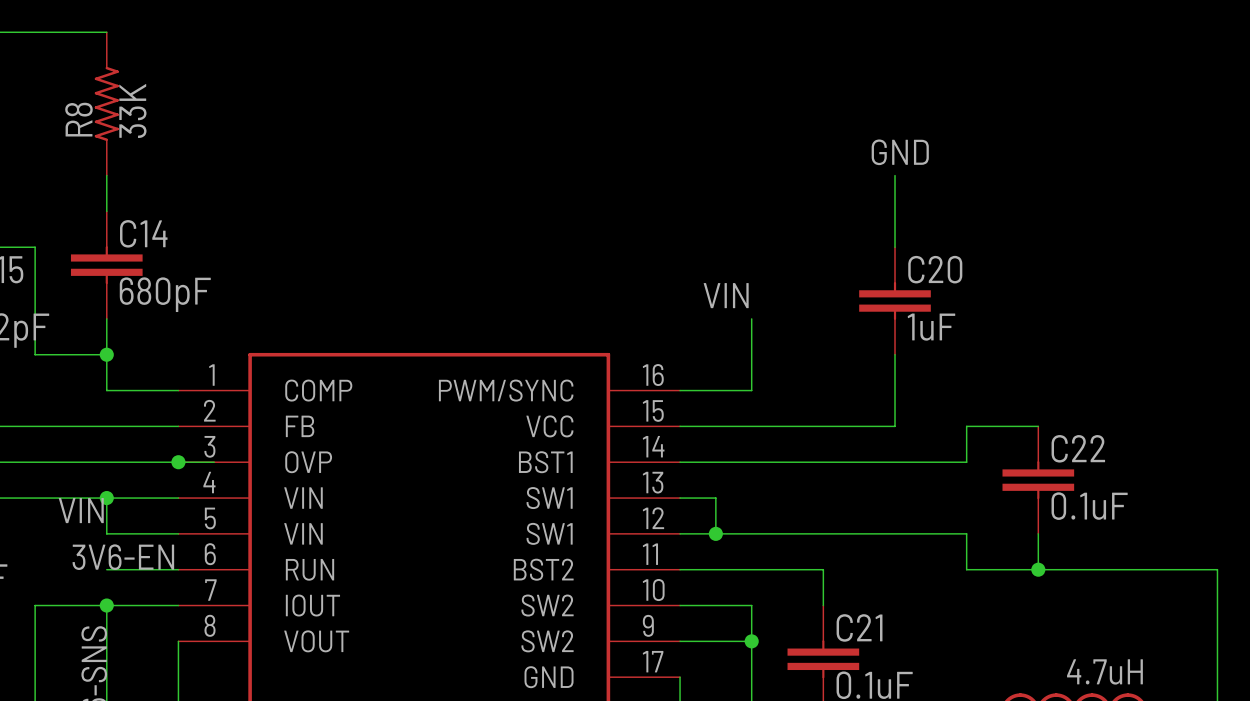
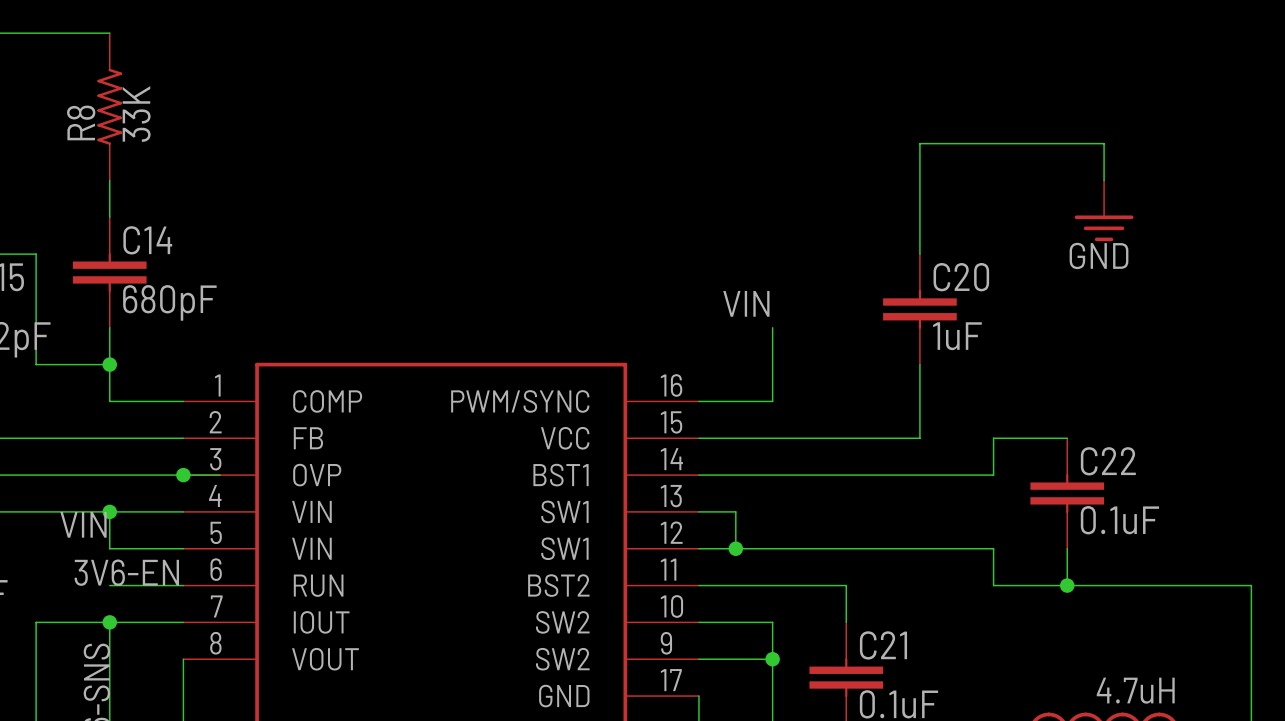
label: GND (900, 152) -> none
wire: none -> (919, 180) (919, 143) (1104, 143) (1104, 180)
power symbol: none -> GND (1104, 210)

